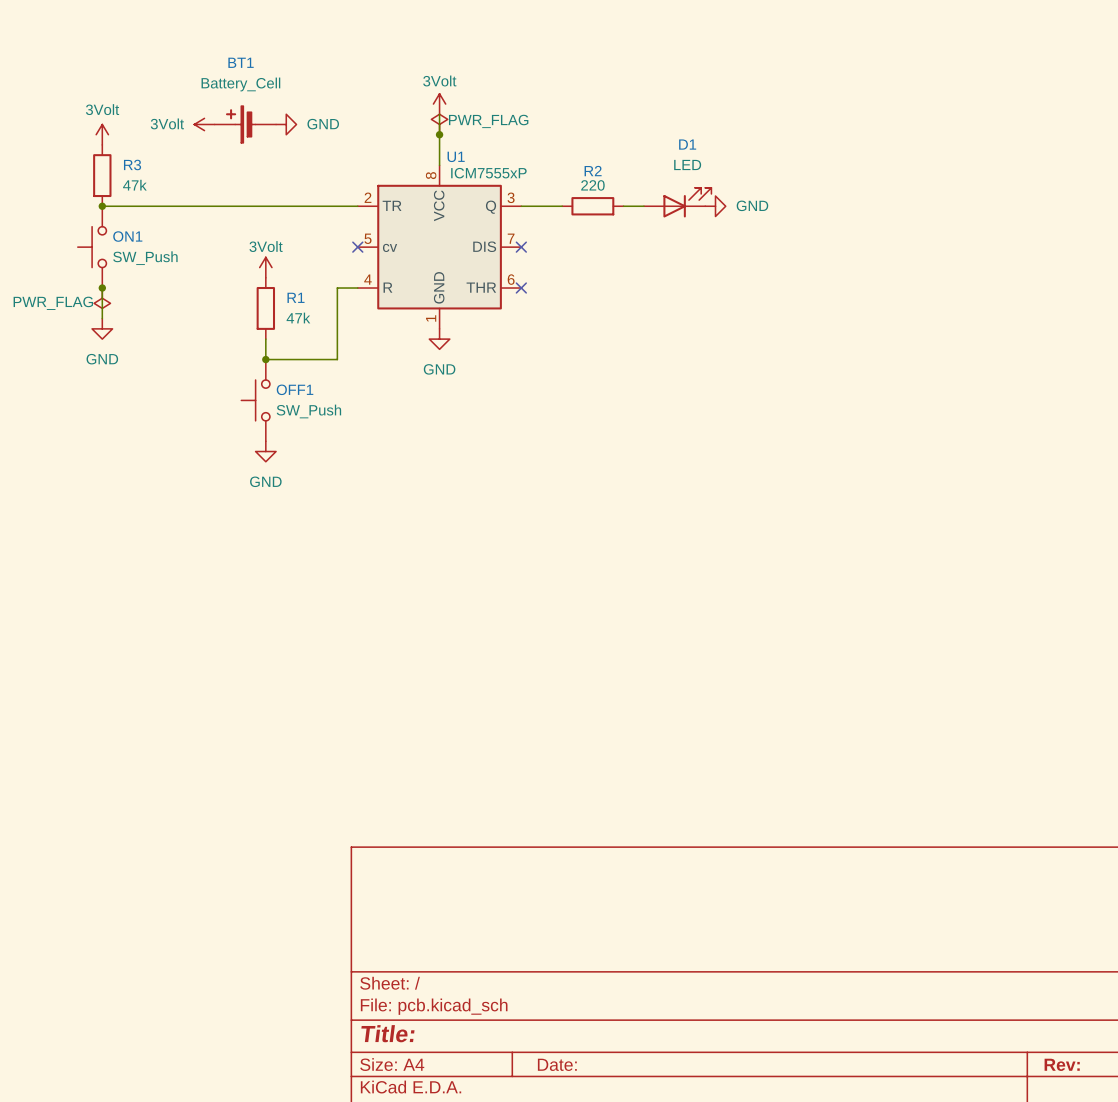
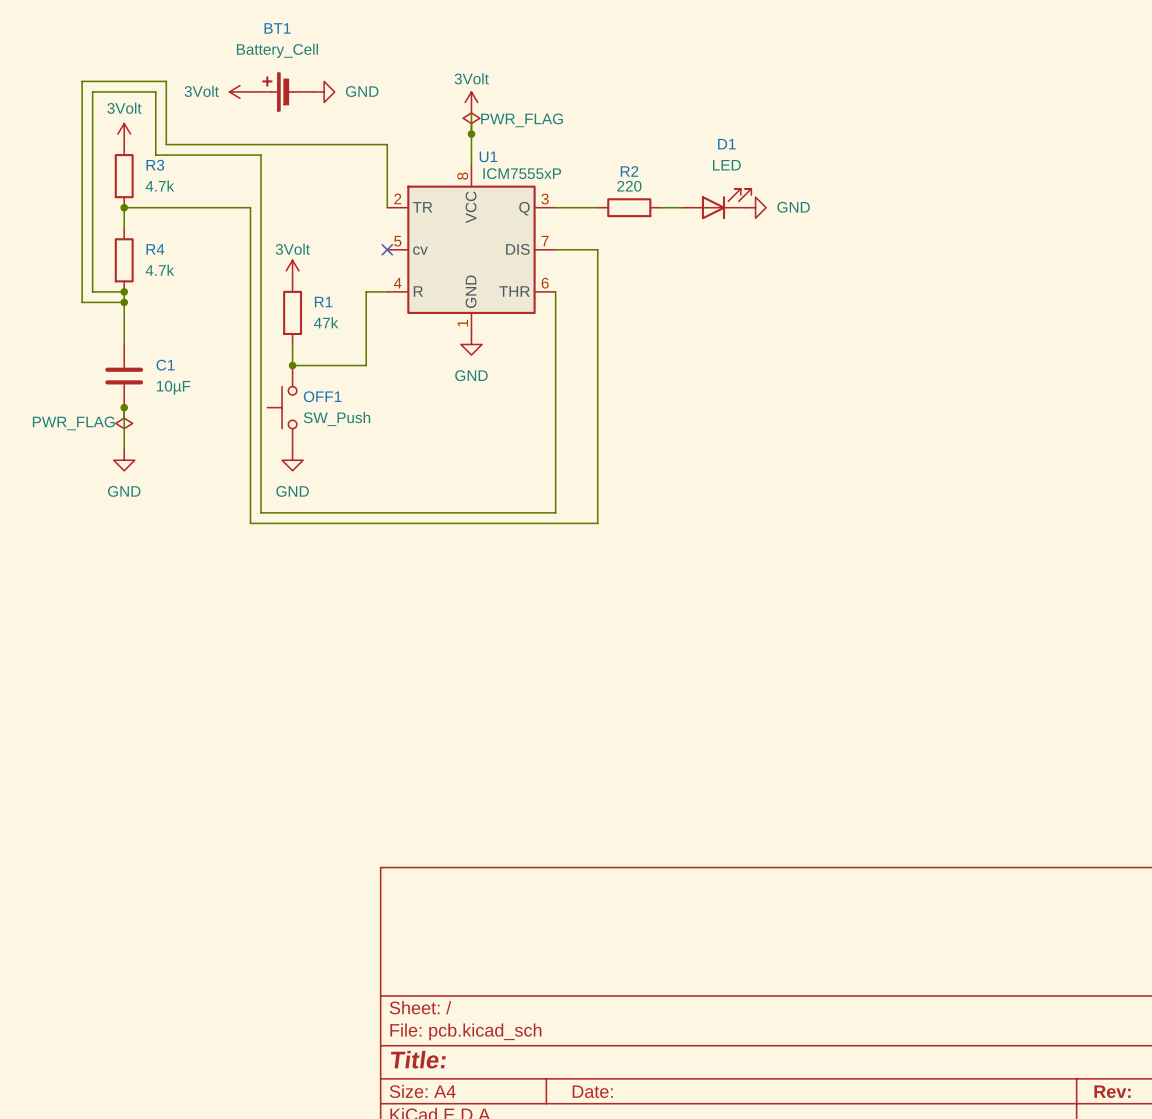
power symbol position: 3Volt (204, 124) -> 3Volt (239, 91)
BT1 position: (245, 124) -> (282, 91)
power symbol position: GND (286, 124) -> GND (324, 91)
R3 value: 47k (134, 185) -> 4.7k (159, 185)
wire: (224, 206) (357, 206) -> (124, 302) (82, 302) (82, 81) (166, 81) (166, 144) (387, 144) (387, 207)
wire: none -> (250, 207) (250, 523) (597, 523) (597, 249) (555, 249)
ON1: SW_Push (92, 247) -> none
no-connect mark: (521, 247) -> none
R4: none -> 4.7k (124, 260)
wire: none -> (124, 291) (92, 291) (92, 91) (155, 91) (155, 155) (261, 155) (261, 512) (555, 512) (555, 291)
no-connect mark: (521, 288) -> none
power symbol position: PWR_FLAG (102, 298) -> PWR_FLAG (124, 418)
junction: none -> (124, 302)
power symbol position: GND (102, 328) -> GND (124, 460)
C1: none -> 10µF (124, 376)
wire: none -> (124, 407) (124, 449)
junction: none -> (124, 407)

